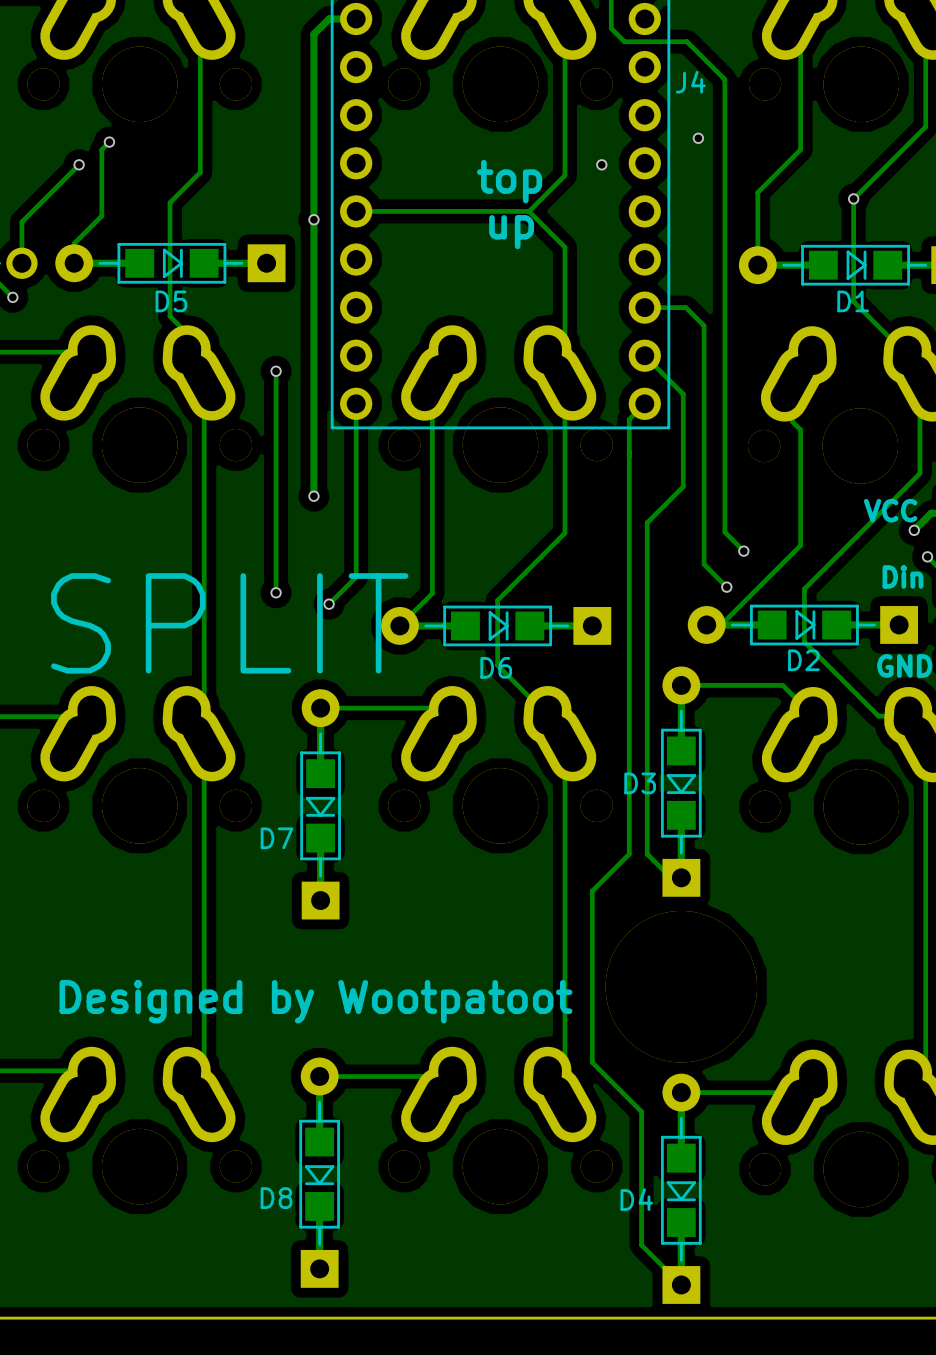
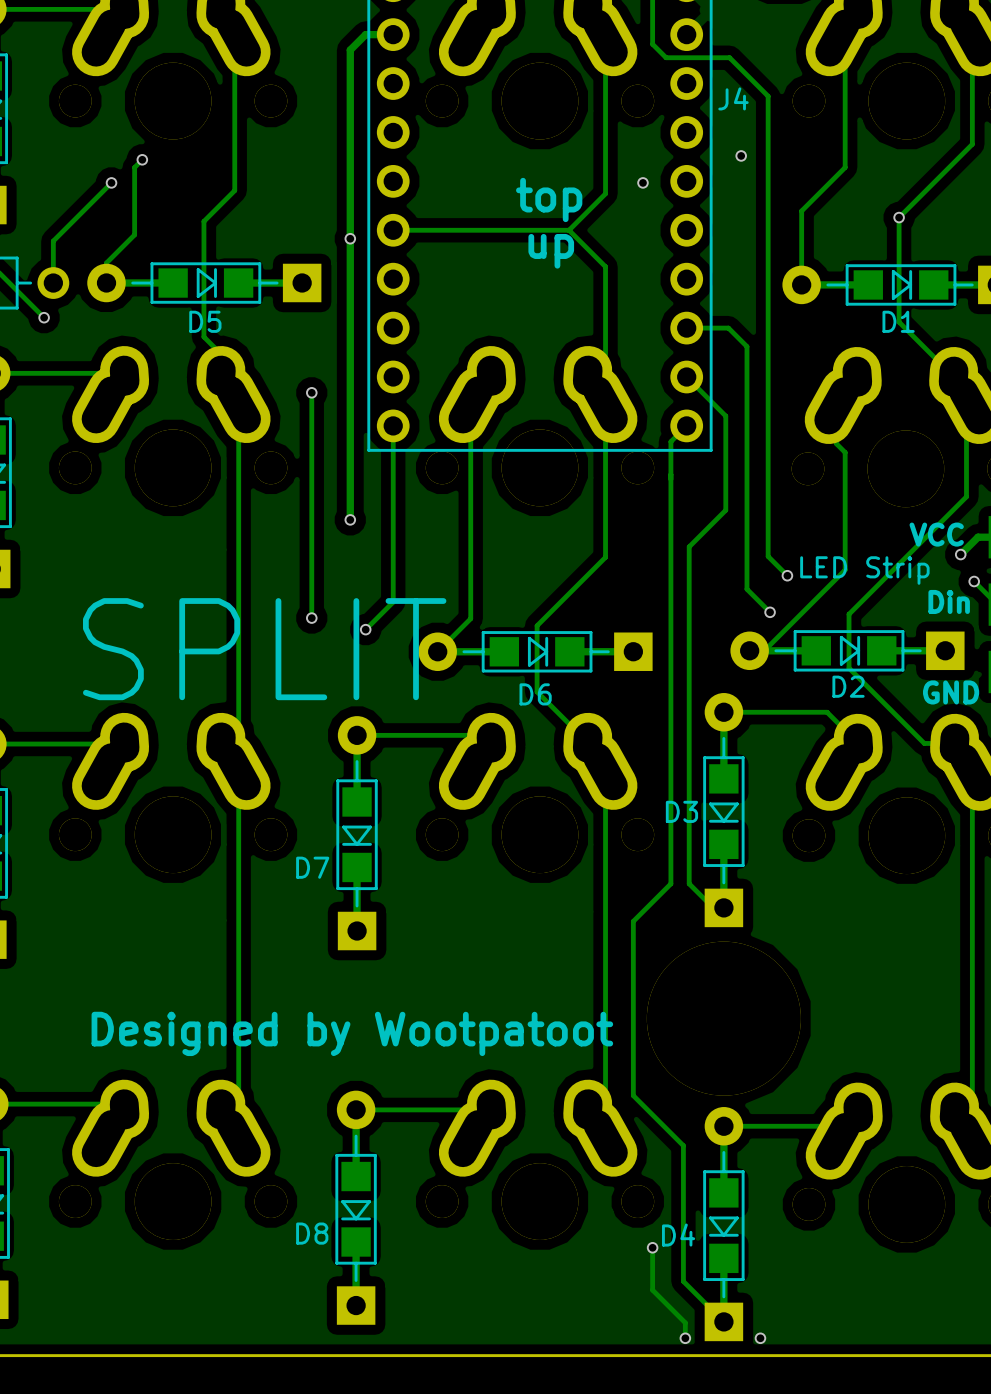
text: none -> LED Strip (864, 570)
track: none -> (652, 1247) (652, 1290) (685, 1322) (685, 1338)
via: none -> (652, 1247)
via: none -> (685, 1338)
via: none -> (760, 1338)

